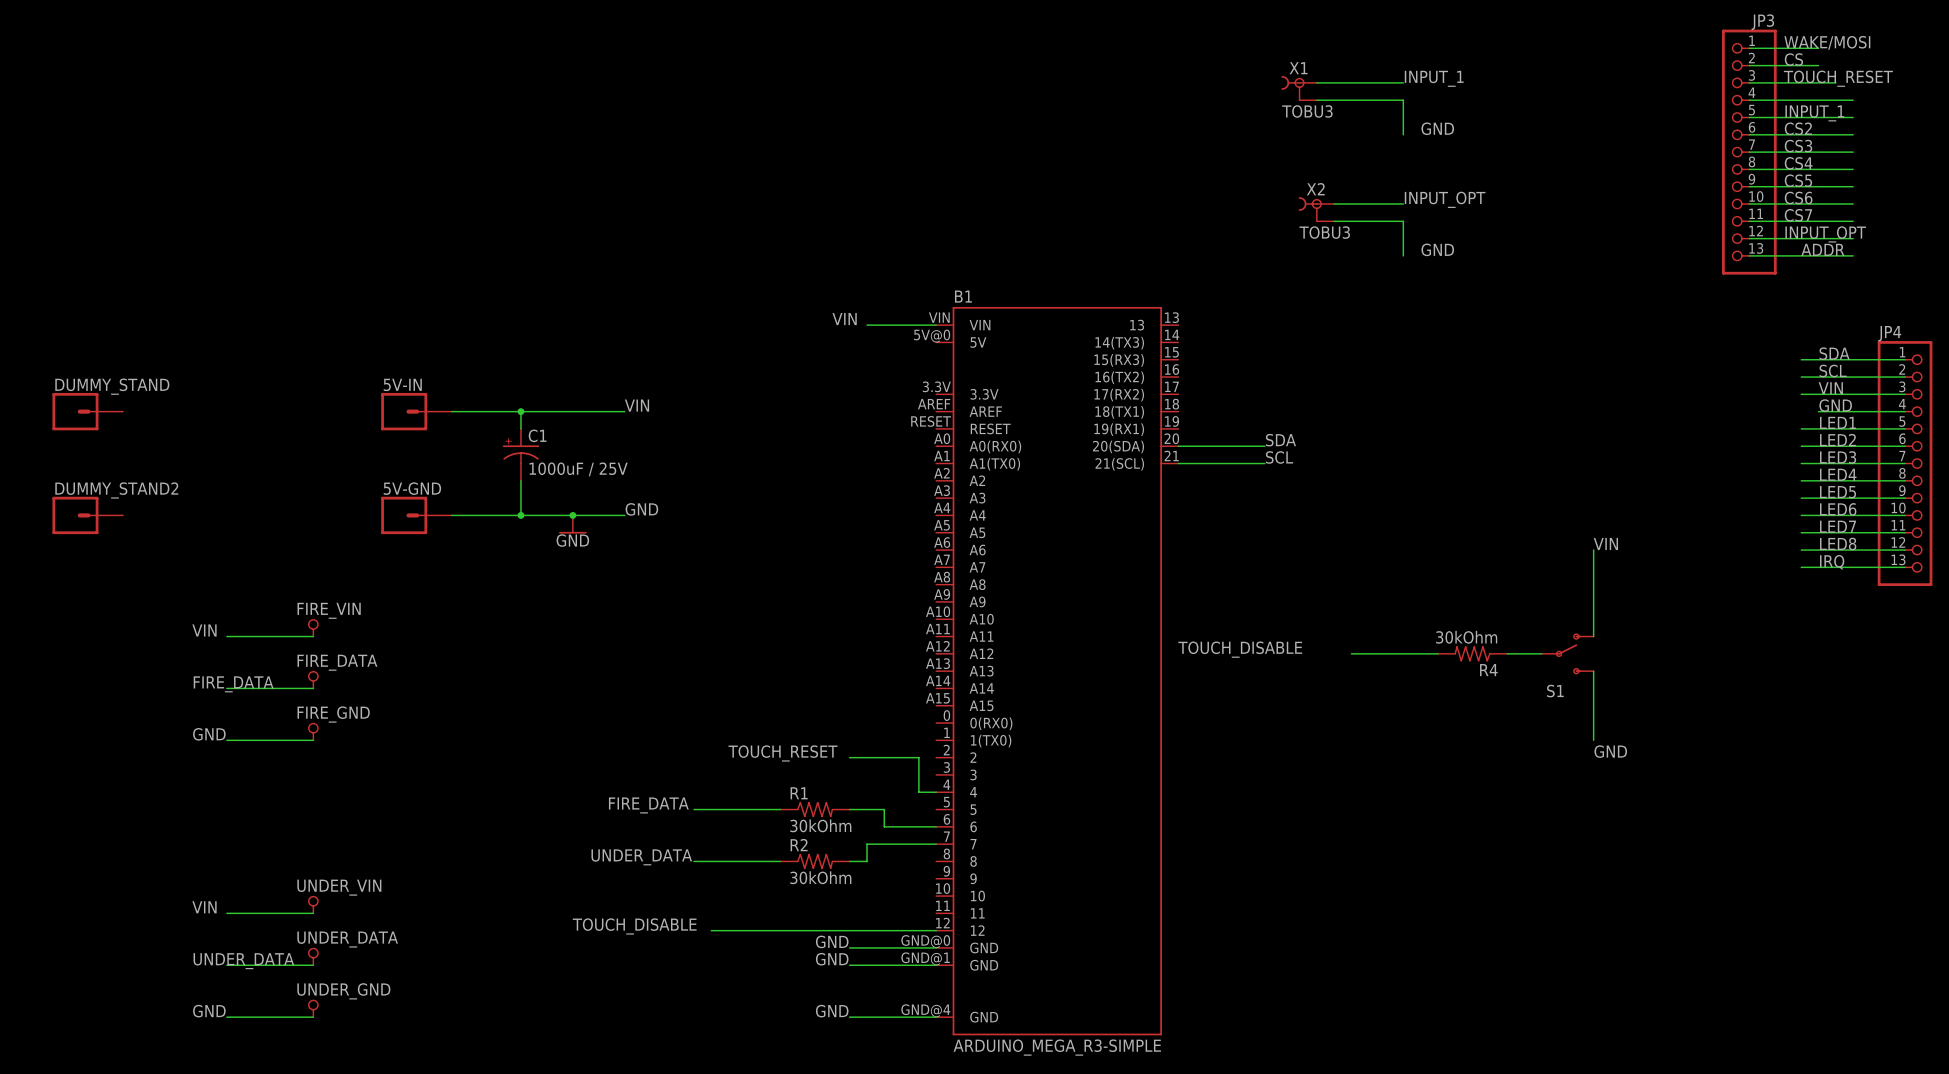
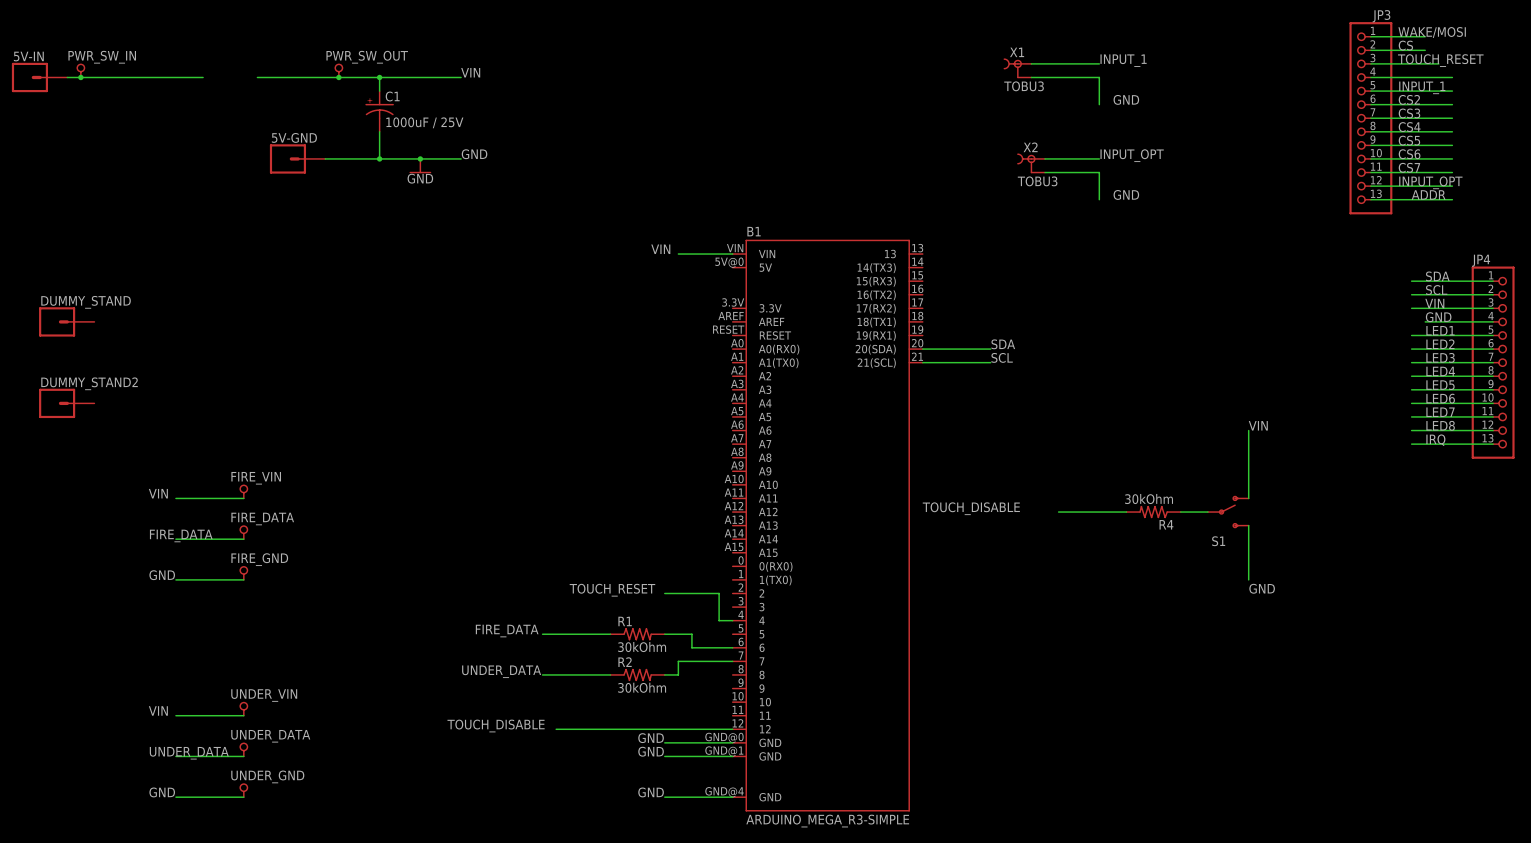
PWR_SW_IN: none -> (80, 70)
PWR_SW_OUT: none -> (338, 70)
label: none -> VIN (470, 72)
wire: none -> (67, 77) (203, 77)
junction: none -> (80, 77)
wire: none -> (257, 77) (461, 77)
junction: none -> (338, 77)
wire: none -> (379, 77) (379, 91)
junction: none -> (379, 77)
wire: none -> (379, 131) (379, 158)
label: none -> GND (474, 154)
wire: none -> (325, 158) (461, 158)
junction: none -> (379, 158)
junction: none -> (420, 158)
power symbol: none -> GND (420, 166)
label: VIN (637, 405) -> none
5V-IN position: (416, 411) -> (39, 77)
wire: (451, 411) (624, 411) -> none
wire: (520, 411) (520, 428) -> none
junction: (520, 411) -> none
C1 position: (520, 454) -> (379, 111)
wire: (520, 480) (520, 515) -> none
label: GND (641, 509) -> none
5V-GND position: (416, 515) -> (297, 158)
wire: (451, 515) (624, 515) -> none
junction: (520, 515) -> none
junction: (572, 515) -> none
power symbol: GND (572, 524) -> none

